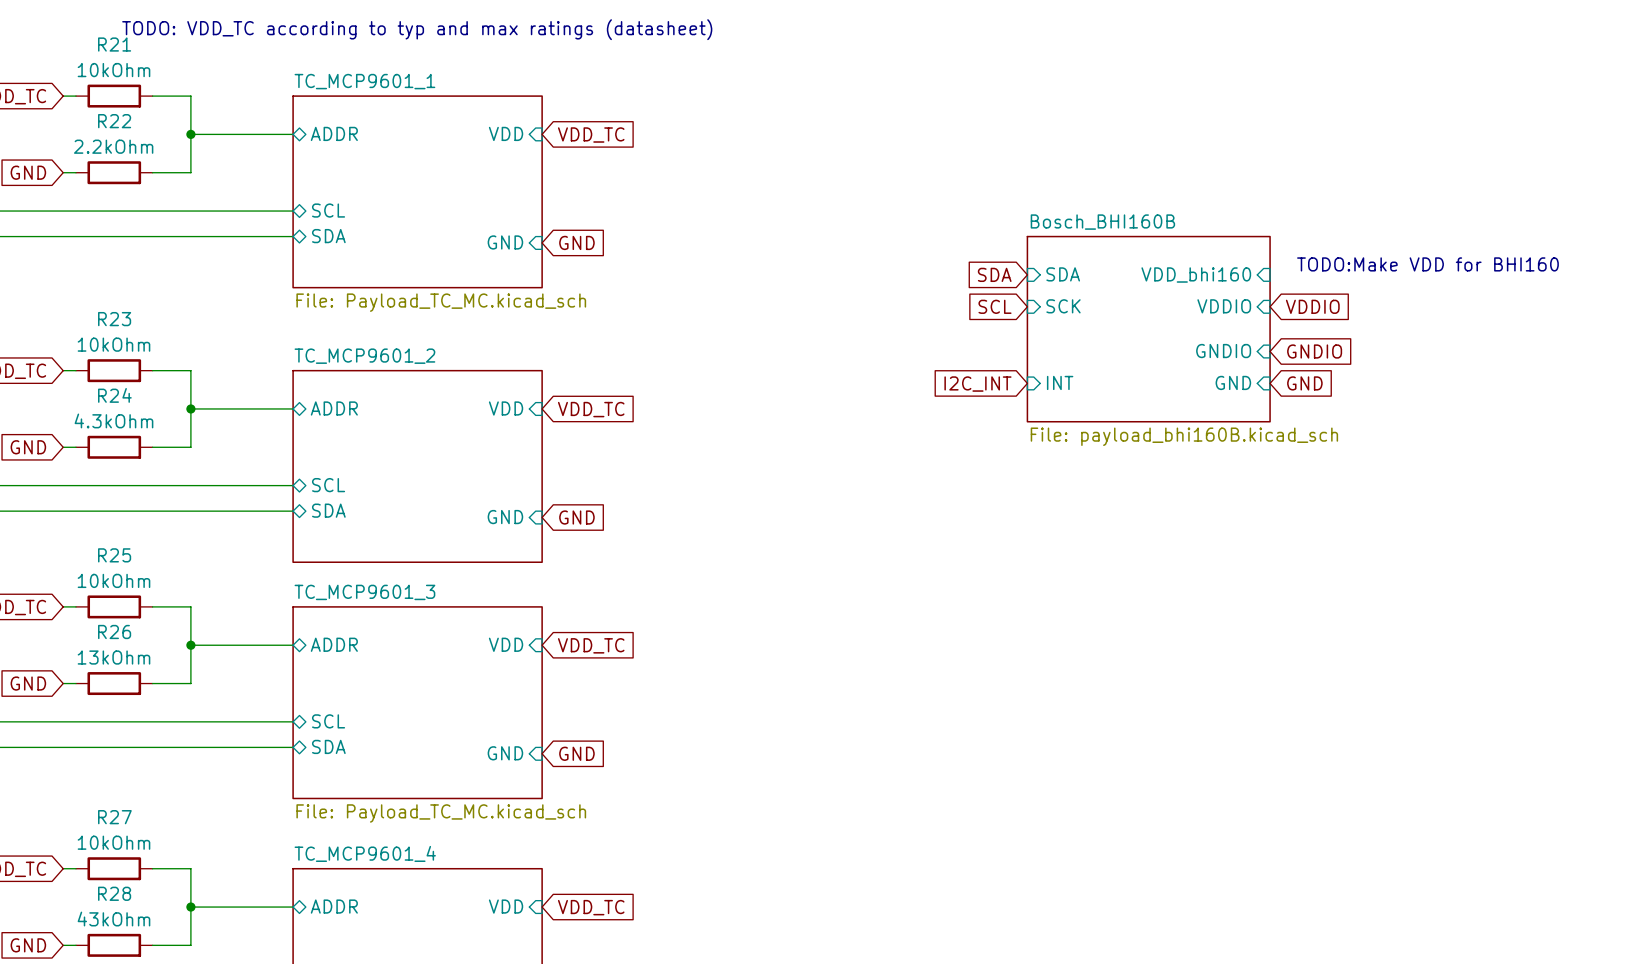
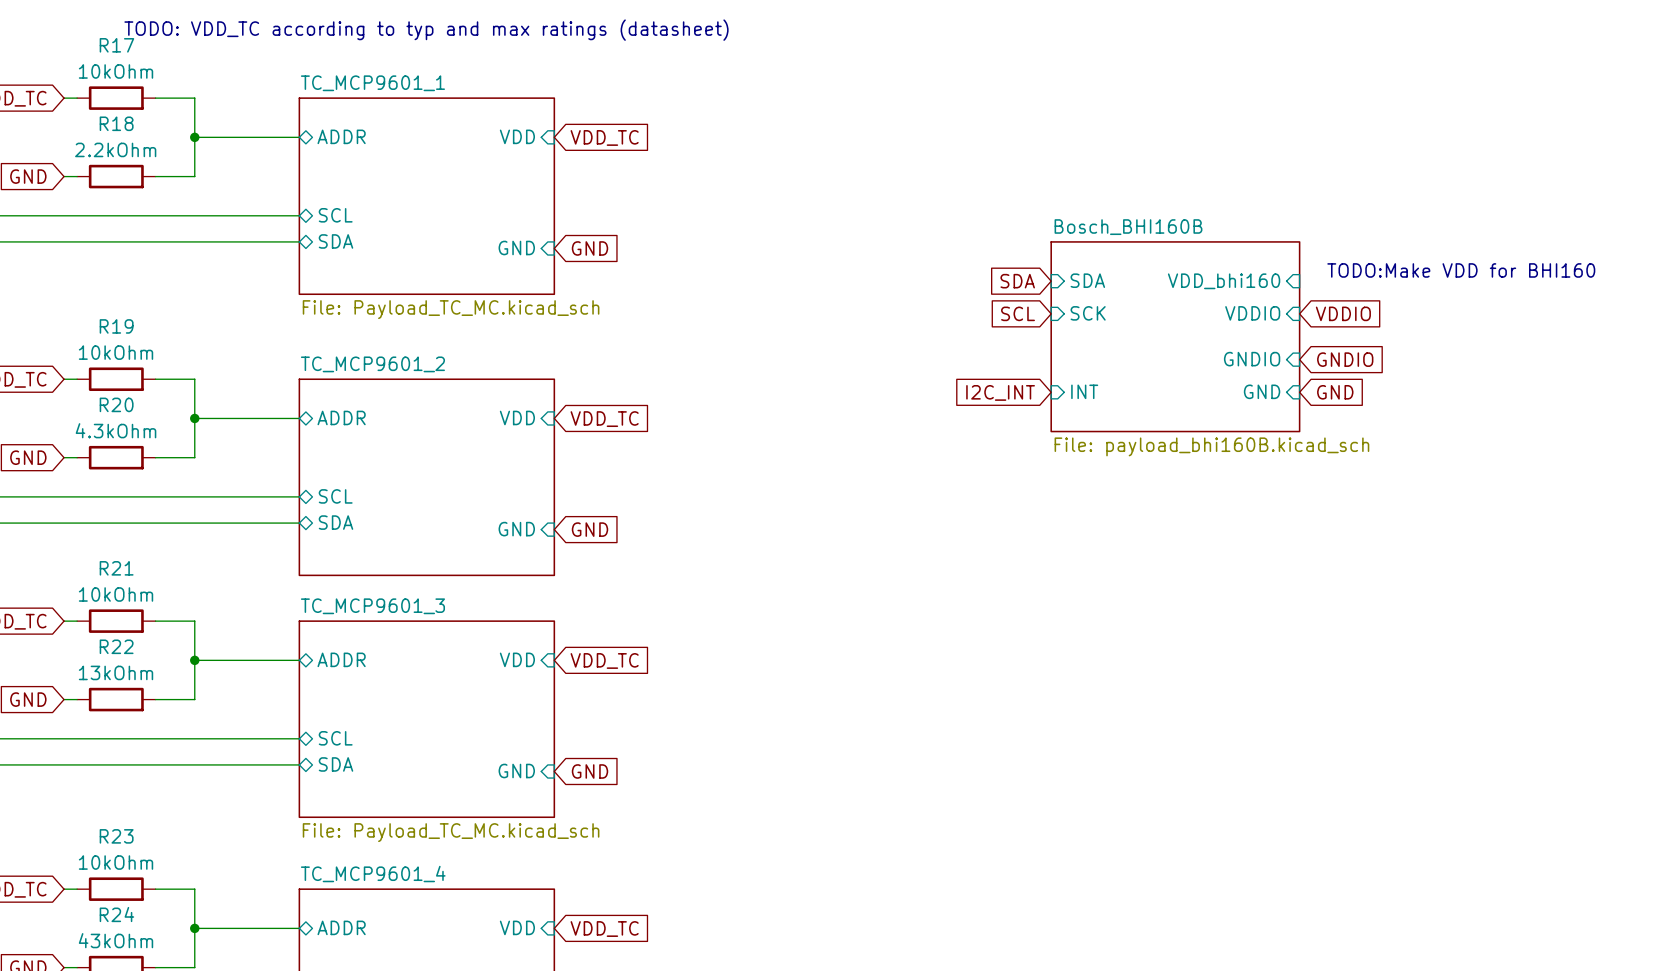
R21 name: R21 (114, 44) -> R17 (116, 45)
R22 name: R22 (114, 121) -> R18 (116, 123)
R23 name: R23 (114, 319) -> R19 (116, 326)
R24 name: R24 (114, 395) -> R20 (116, 404)
R25 name: R25 (114, 555) -> R21 (116, 568)
R26 name: R26 (114, 631) -> R22 (116, 646)
R27 name: R27 (114, 817) -> R23 (116, 836)
R28 name: R28 (114, 893) -> R24 (116, 914)

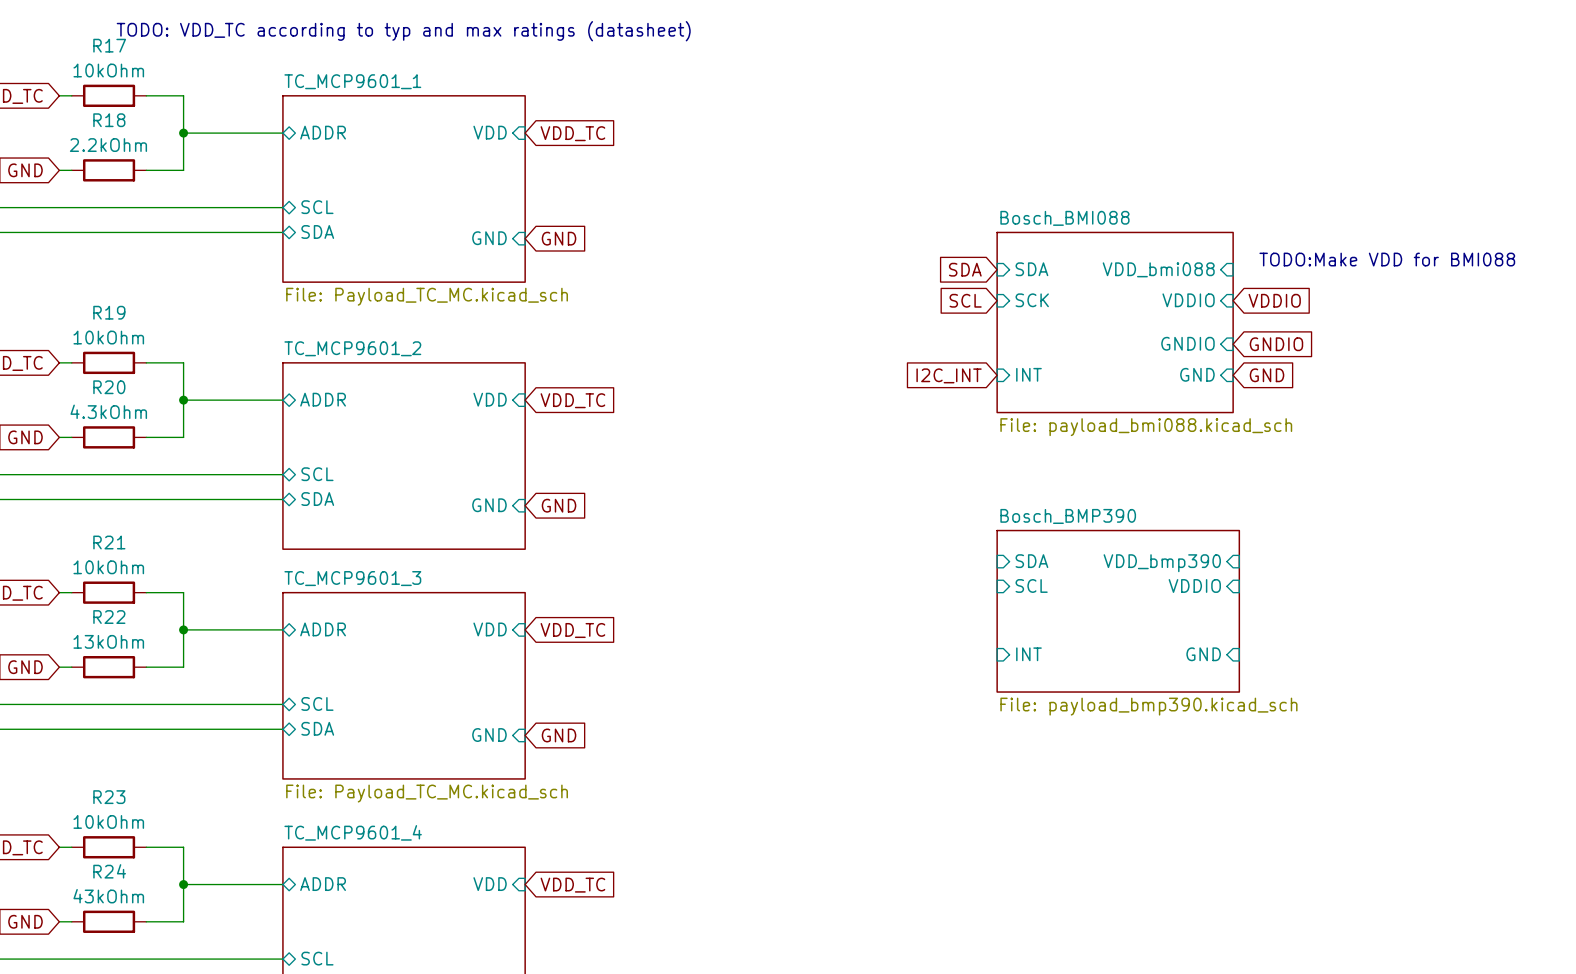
sheet Bosch_BHI160B name: Bosch_BHI160B (1128, 227) -> Bosch_BMI088 (1064, 218)
text: TODO:Make VDD for BHI160 (1461, 270) -> TODO:Make VDD for BMI088 (1387, 259)
sheet pin: VDD_bhi160 (1224, 281) -> VDD_bmi088 (1158, 269)
sheet Bosch_BHI160B value: File: payload_bhi160B.kicad_sch (1211, 446) -> File: payload_bmi088.kicad_sch (1146, 427)
sheet pin: none -> SDA (1031, 561)
sheet pin: none -> VDD_bmp390 (1162, 563)
sheet pin: none -> SCL (1031, 585)
sheet pin: none -> VDDIO (1194, 585)
sheet Bosch_BMP390: none -> File: payload_bmp390.kicad_sch (1118, 611)
sheet pin: none -> INT (1028, 654)
sheet pin: none -> GND (1203, 654)

